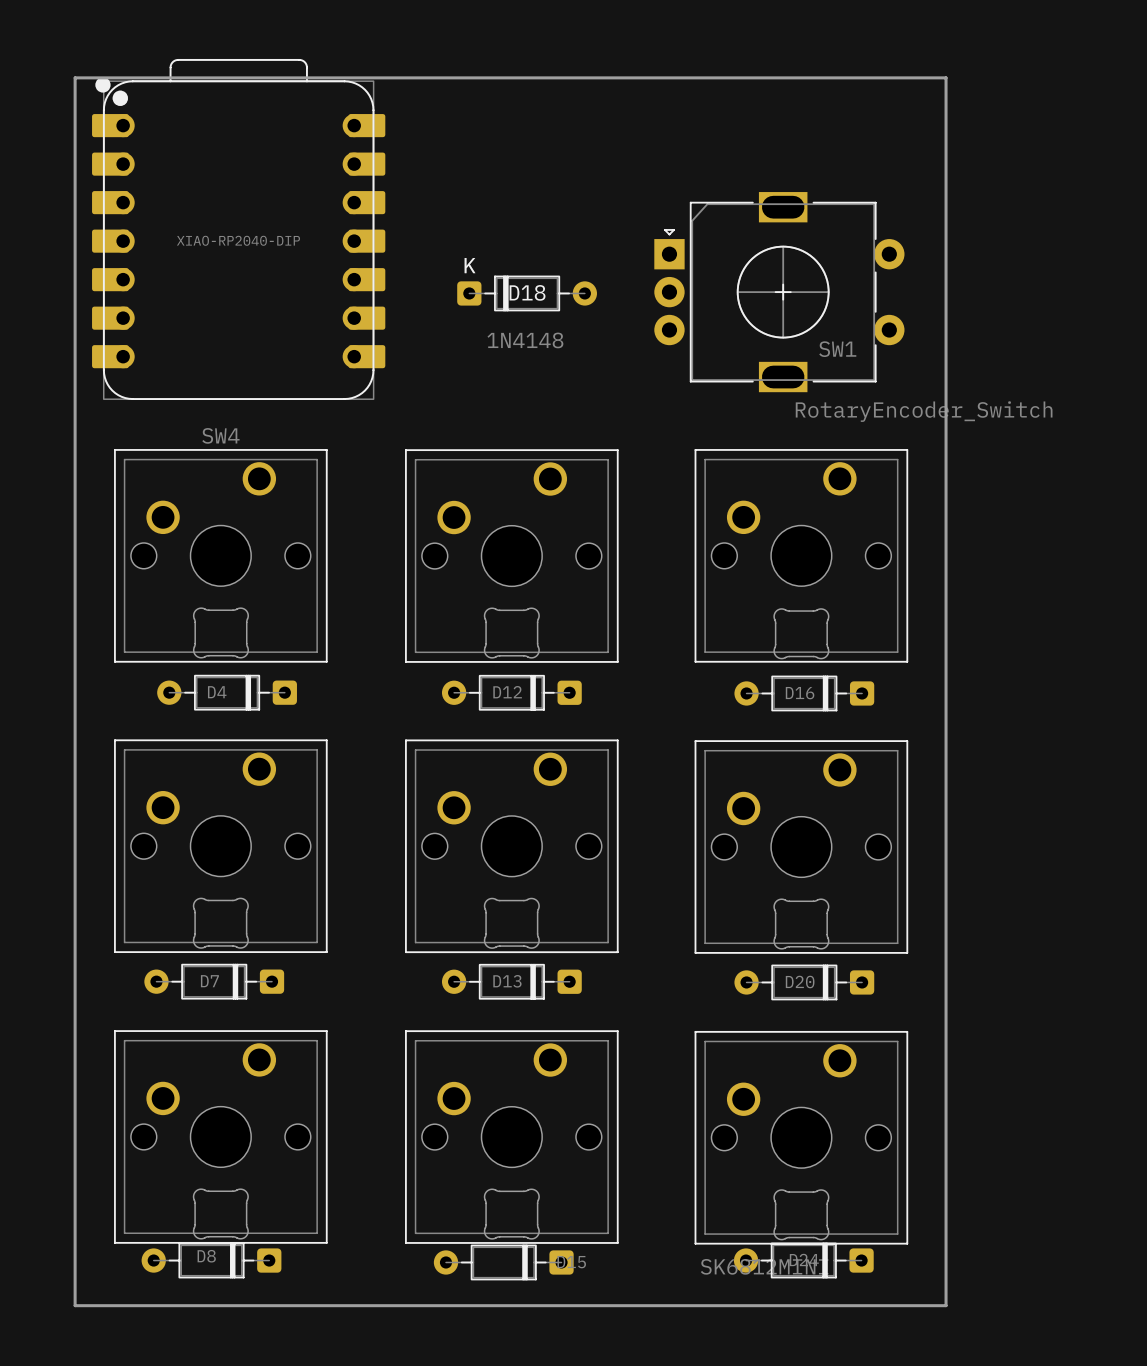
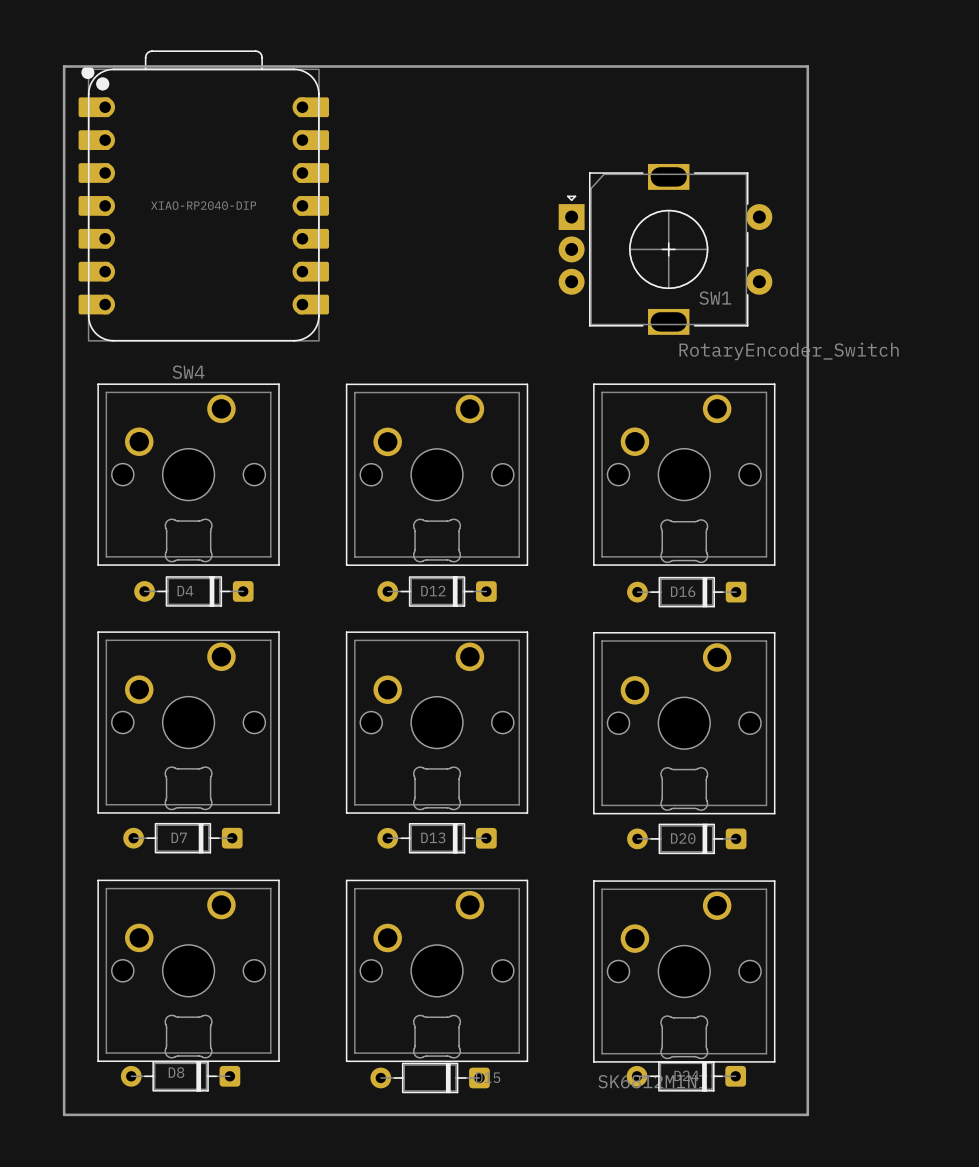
D18: 1N4148 (527, 293) -> none

